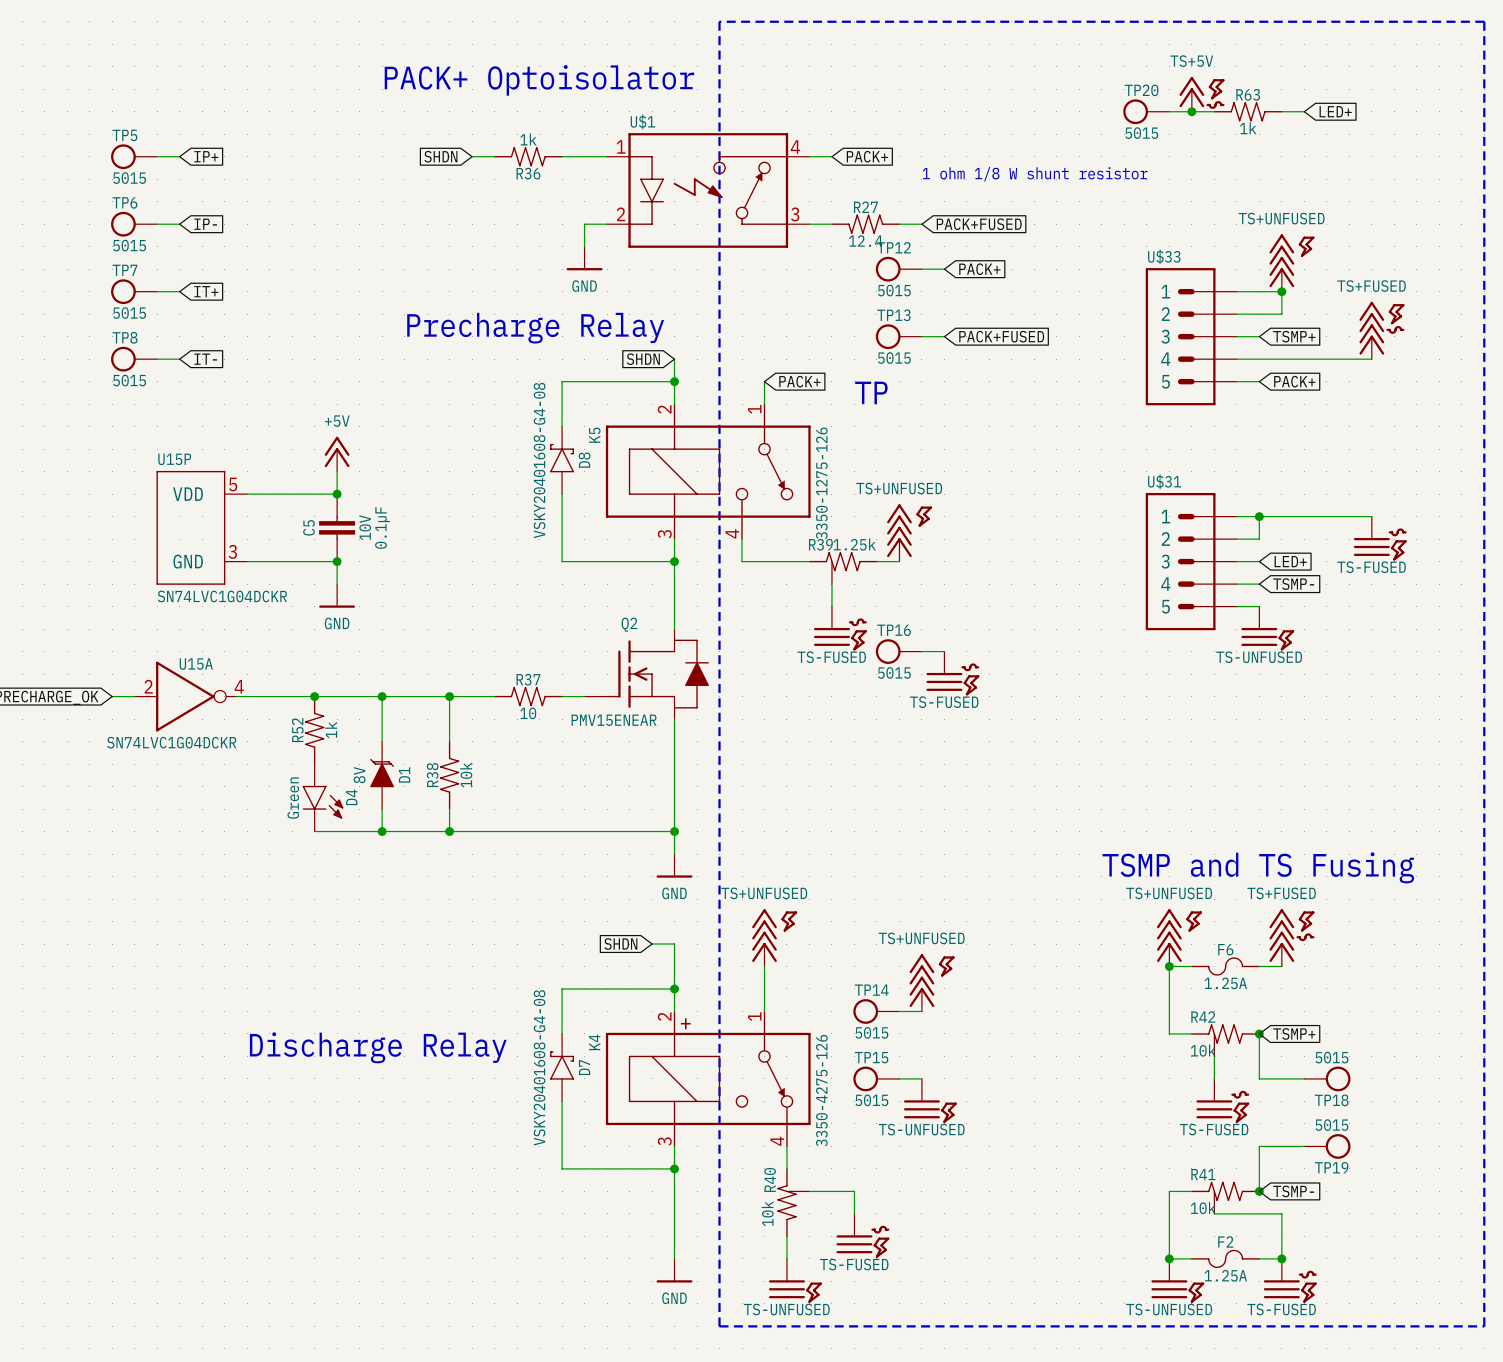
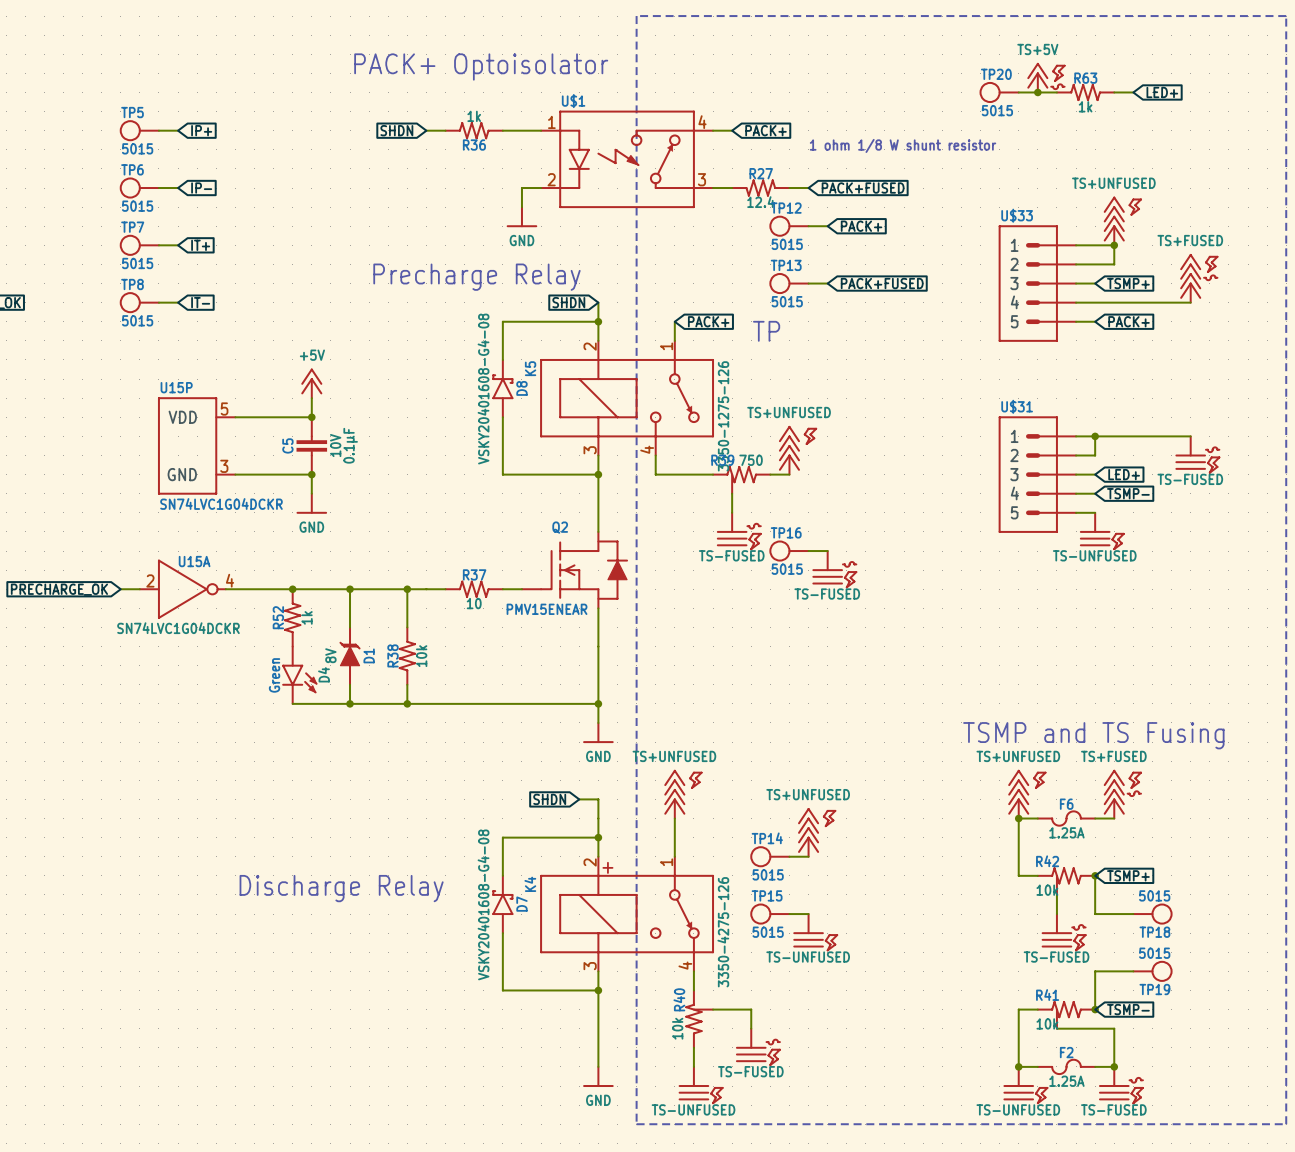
R39 text: 1.25k (854, 544) -> 750 (751, 460)

